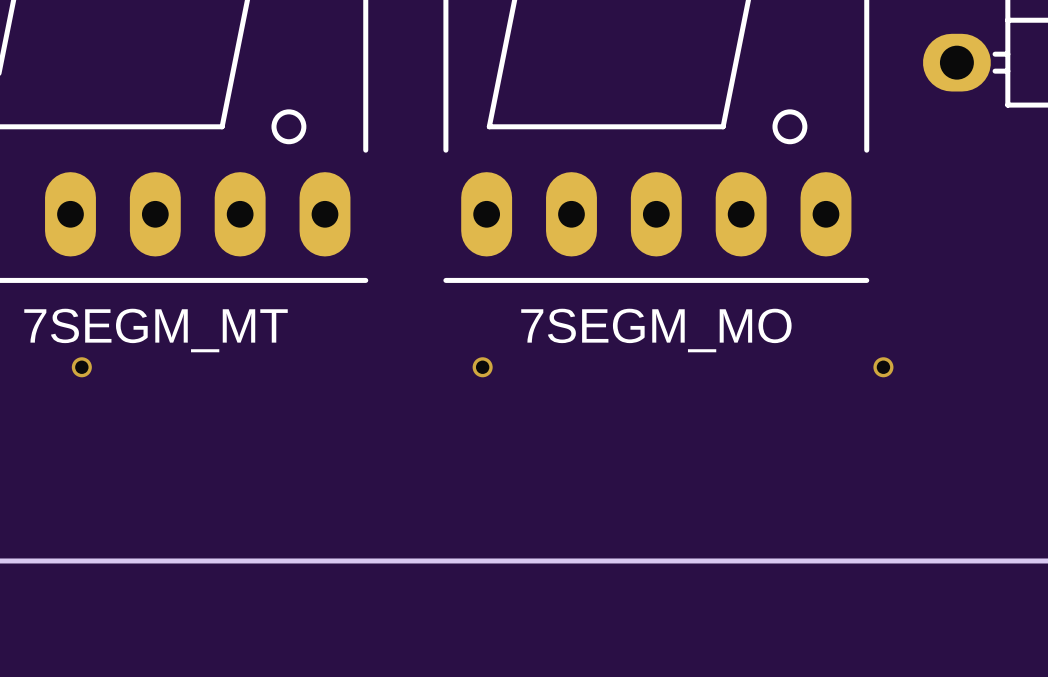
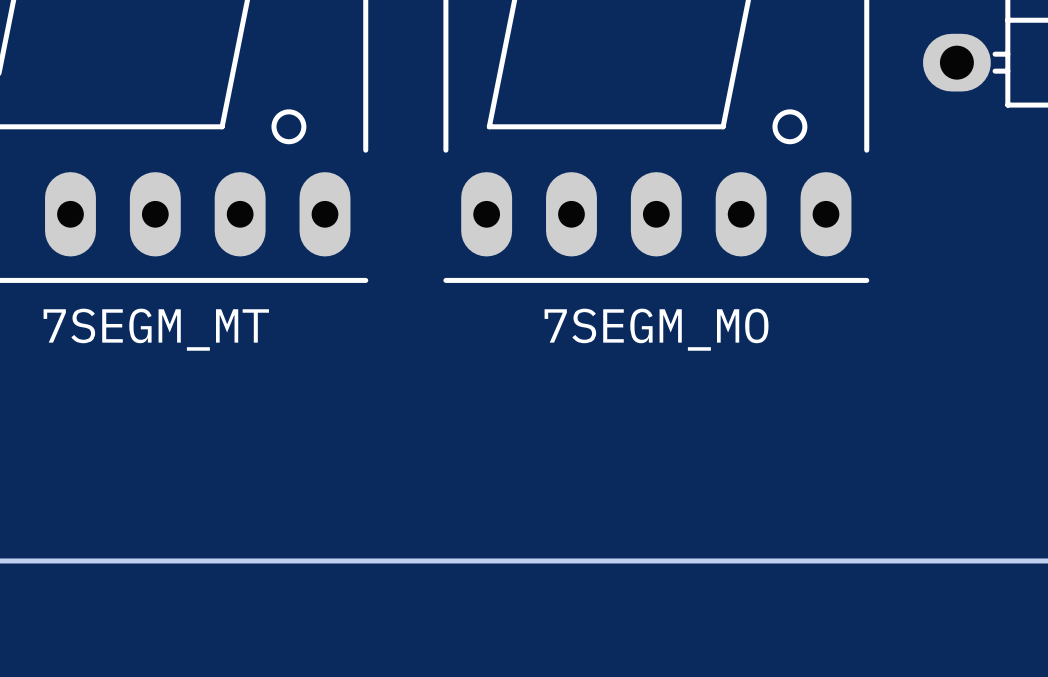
via: (81, 367) -> none
via: (482, 367) -> none
via: (883, 367) -> none

